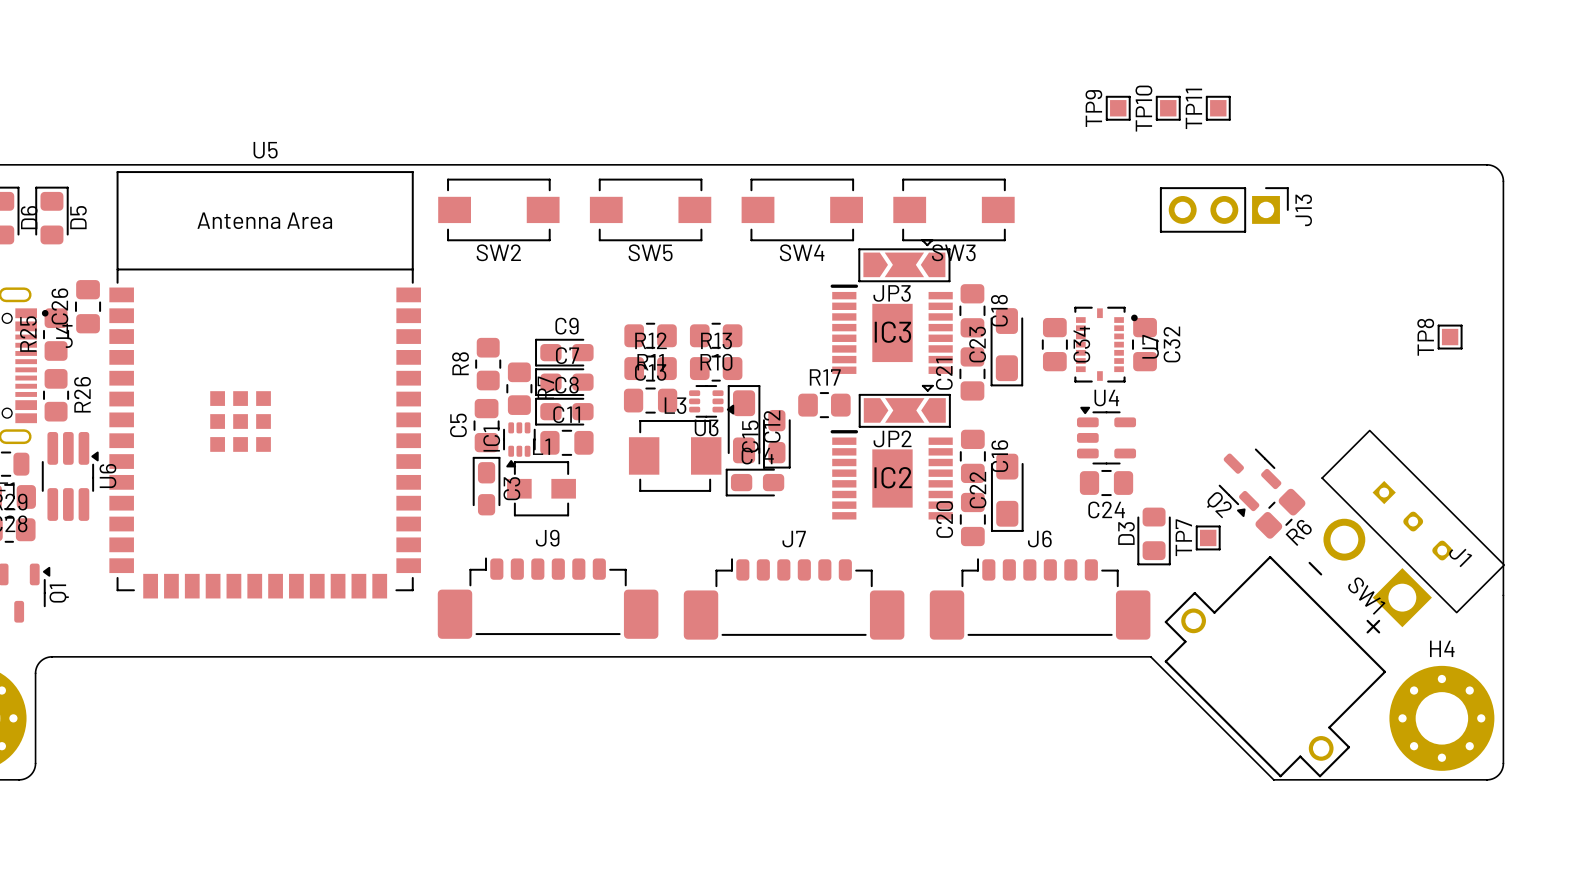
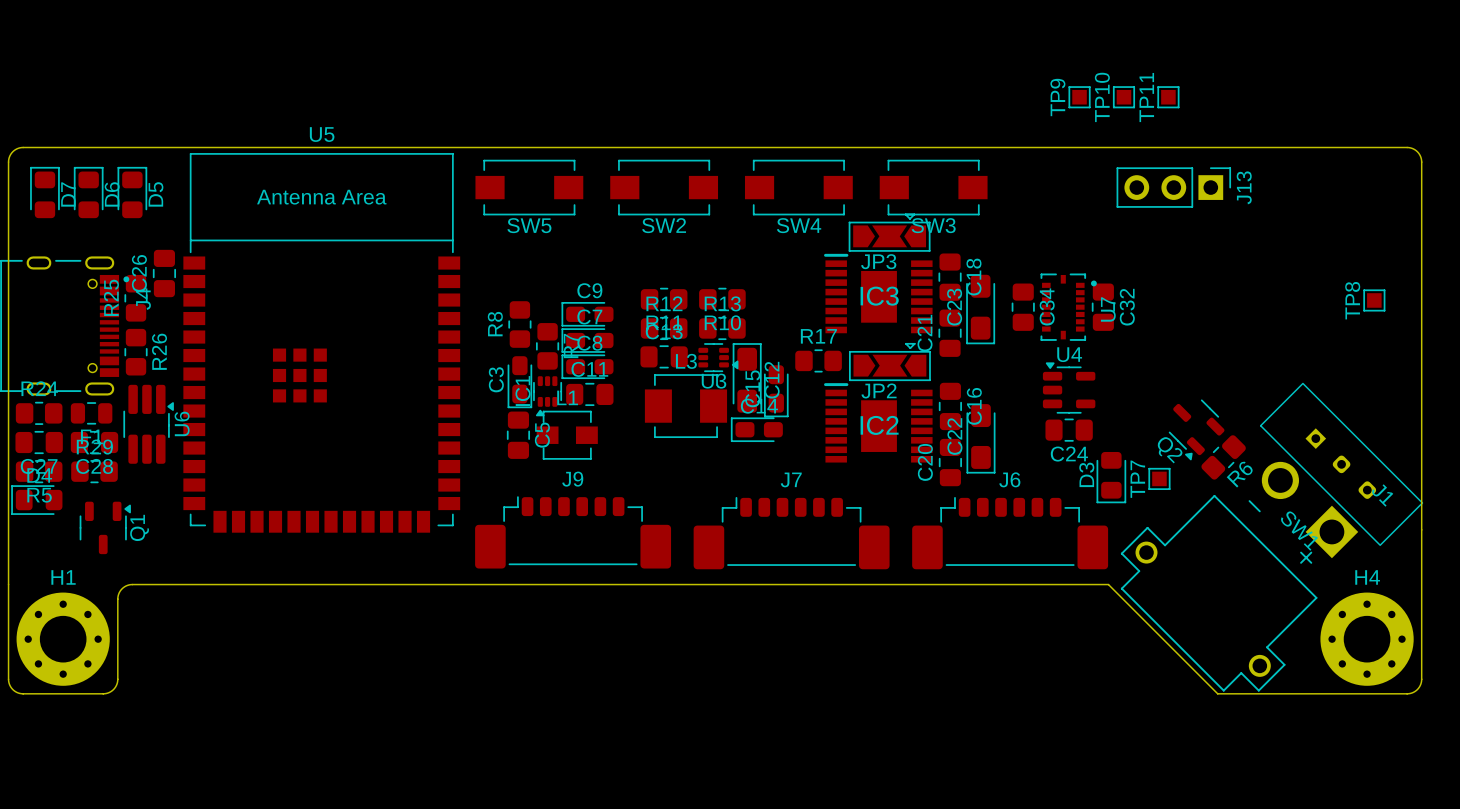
SW2 name: SW2 (498, 252) -> SW5 (529, 225)
SW5 name: SW5 (650, 252) -> SW2 (664, 225)
C5 name position: C5 (458, 425) -> C5 (542, 435)
C5 position: (486, 425) -> (518, 435)
C3 rotation: 0° (486, 486) -> 180° (519, 382)
C3 position: (486, 486) -> (519, 382)

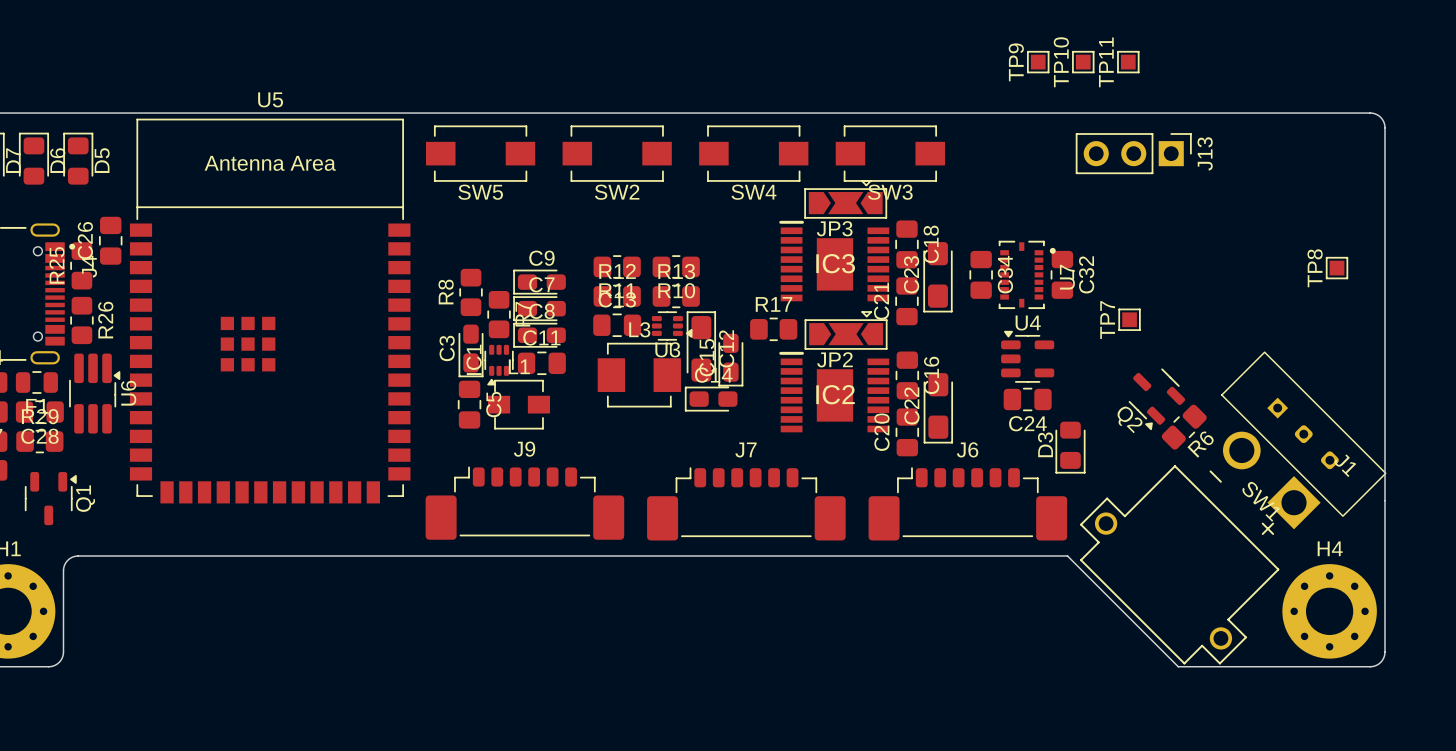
TP7 position: (1159, 478) -> (1129, 319)

